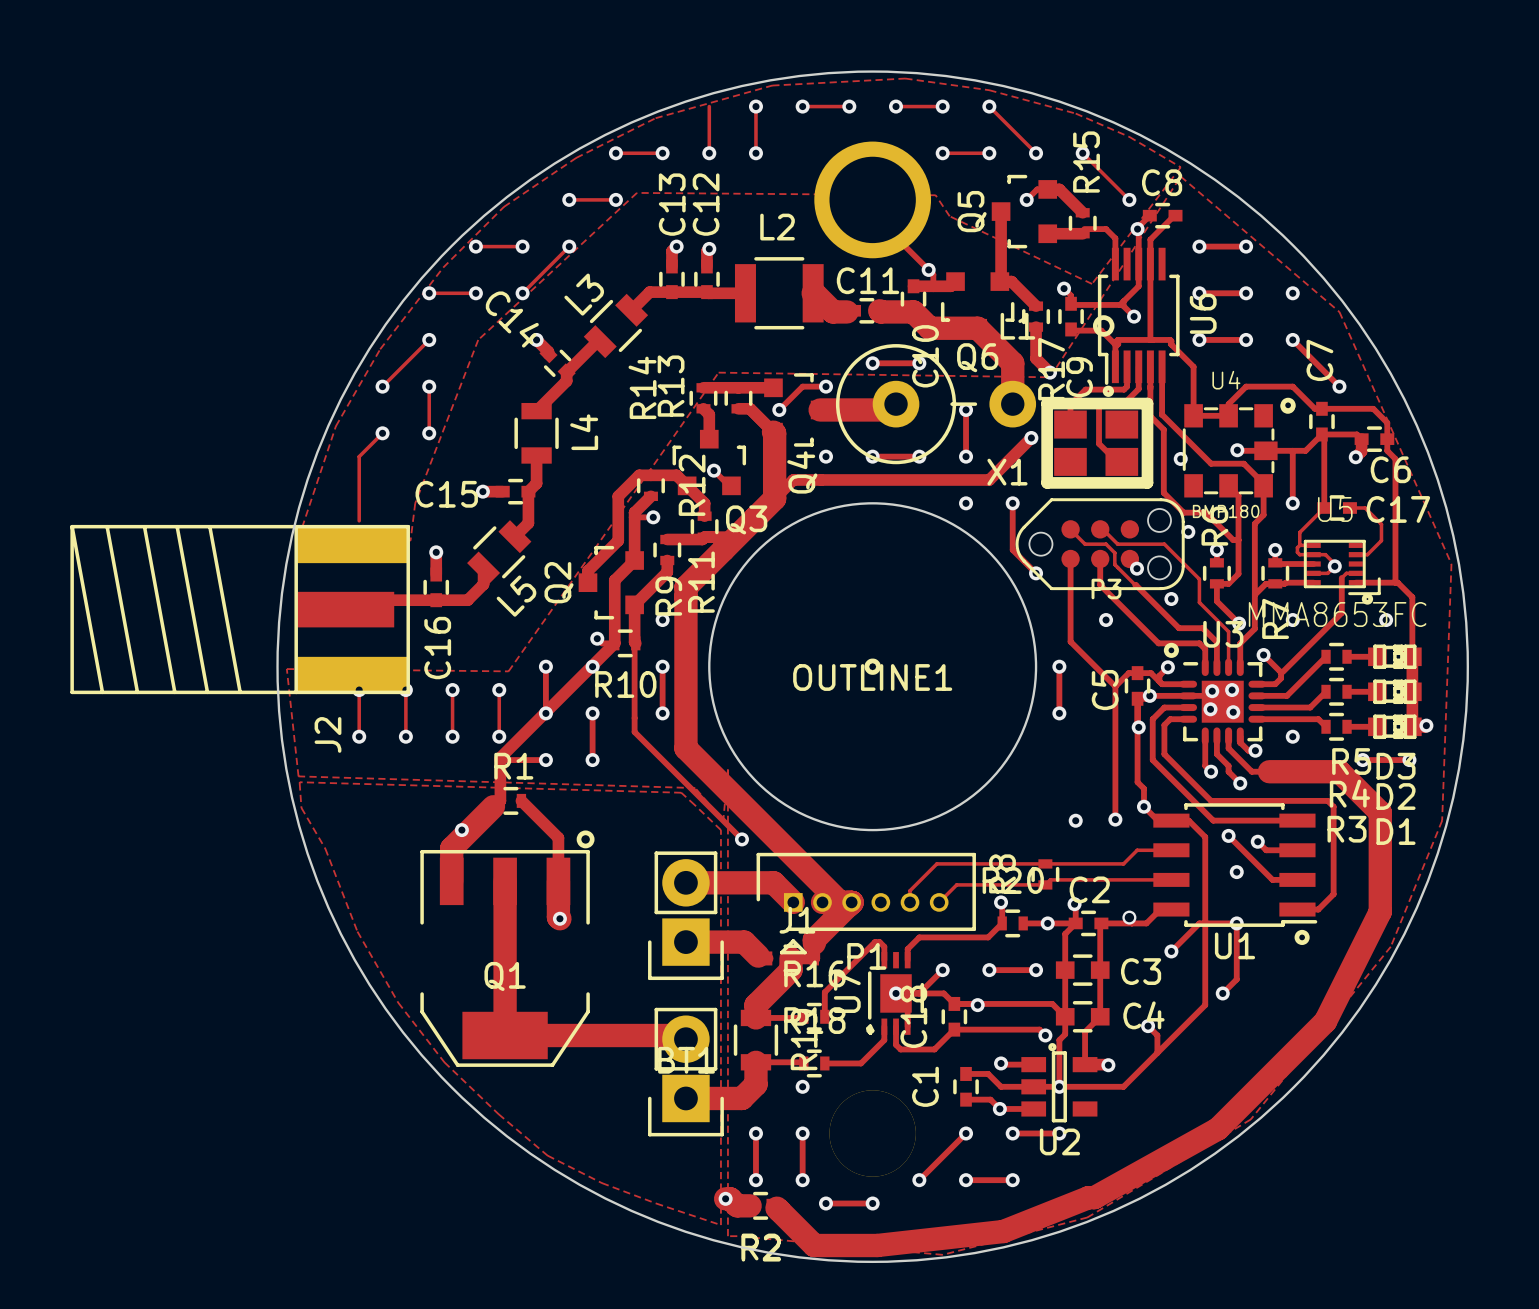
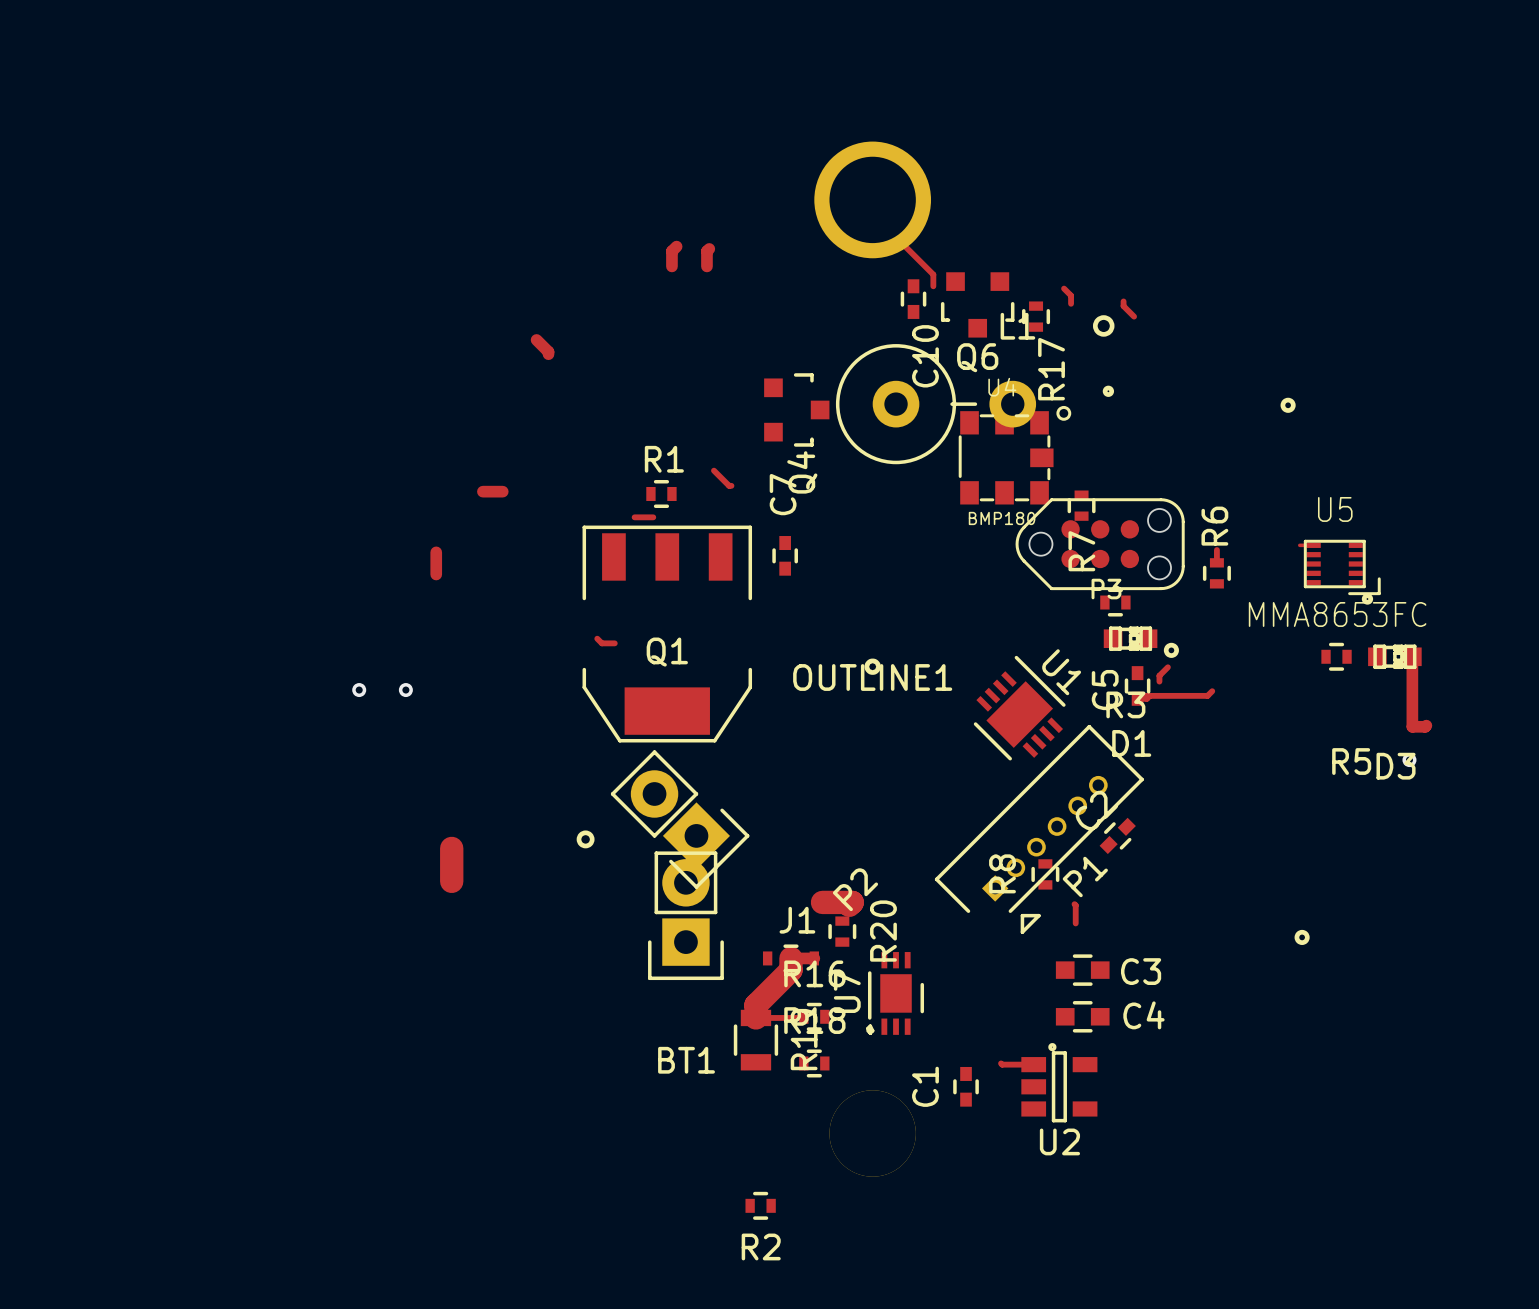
round board edge: [276, 70, 1469, 1264] -> none
zone outline: (905, 78) (772, 85) (655, 118) (576, 157) (503, 206) (443, 267) (380, 349) (335, 426) (298, 538) (410, 540) (415, 503) (478, 339) (636, 192) (935, 195) (949, 216) (1092, 283) (1180, 167) (1129, 136) (1075, 113) (989, 90) (905, 78) -> none
track: (709, 106) (709, 153) -> none
track: (755, 106) (755, 153) -> none
via: (755, 106) -> none
track: (802, 106) (849, 106) -> none
via: (802, 106) -> none
via: (849, 106) -> none
track: (896, 106) (942, 106) -> none
via: (896, 106) -> none
via: (942, 106) -> none
track: (989, 106) (1036, 153) -> none
via: (989, 106) -> none
track: (615, 153) (662, 153) -> none
via: (615, 153) -> none
via: (662, 153) -> none
via: (709, 153) -> none
via: (755, 153) -> none
track: (942, 153) (989, 153) -> none
via: (942, 153) -> none
via: (989, 153) -> none
via: (1036, 153) -> none
track: (1082, 153) (1129, 199) -> none
via: (1082, 153) -> none
zone outline: (1180, 176) (1050, 377) (718, 372) (508, 671) (286, 669) (298, 776) (695, 788) (723, 820) (727, 769) (727, 1236) (942, 1254) (1087, 1217) (1250, 1119) (1390, 946) (1442, 820) (1451, 564) (1339, 311) (1180, 176) -> none
track: (569, 199) (615, 199) -> none
via: (569, 199) -> none
via: (615, 199) -> none
track: (1026, 199) (1037, 189) (1059, 189) (1082, 212) -> none
via: (1026, 199) -> none
via: (1129, 199) -> none
track: (1001, 211) (999, 281) (1011, 281) (1036, 306) -> none
Q5: (1024, 211) -> none
track: (1149, 215) (1138, 226) (1138, 286) (1120, 304) (1072, 304) -> none
C8: (1162, 215) -> none
track: (1175, 215) (1150, 239) (1150, 339) -> none
R15: (1082, 223) -> none
track: (1084, 229) (1106, 229) (1115, 238) (1115, 264) -> none
via: (1137, 229) -> none
track: (1047, 233) (1082, 233) -> none
track: (475, 246) (522, 246) -> none
via: (475, 246) -> none
via: (522, 246) -> none
track: (569, 246) (522, 293) -> none
via: (569, 246) -> none
via: (676, 246) -> none
track: (1199, 246) (1246, 246) -> none
via: (1199, 246) -> none
via: (1246, 246) -> none
via: (709, 248) -> none
via: (928, 269) -> none
C13: (671, 279) -> none
C12: (706, 279) -> none
track: (955, 281) (950, 286) (913, 286) -> none
via: (1064, 288) -> none
track: (429, 293) (475, 293) -> none
via: (429, 293) -> none
via: (475, 293) -> none
via: (522, 293) -> none
track: (745, 293) (649, 292) (631, 310) -> none
L2: (779, 293) -> none
track: (813, 293) (832, 311) (847, 311) -> none
track: (1199, 293) (1246, 293) -> none
via: (1199, 293) -> none
via: (1246, 293) -> none
via: (1292, 293) -> none
C11: (866, 310) -> none
track: (879, 310) (913, 311) (929, 328) (977, 328) (1012, 363) (1012, 404) -> none
C9: (1071, 316) -> none
via: (1134, 316) -> none
U6: (1138, 316) -> none
L3: (615, 325) -> none
track: (1036, 327) (1036, 358) (1050, 372) -> none
track: (1072, 330) (1101, 330) (1115, 344) (1118, 343) -> none
track: (429, 339) (382, 386) -> none
via: (429, 339) -> none
via: (536, 339) -> none
track: (1199, 339) (1246, 339) -> none
via: (1199, 339) -> none
via: (1246, 339) -> none
track: (1292, 339) (1339, 386) -> none
via: (1292, 339) -> none
track: (600, 341) (597, 341) (566, 372) (566, 381) (536, 411) -> none
track: (1170, 343) (1193, 366) (1193, 415) (1228, 415) (1228, 404) (1246, 386) (1292, 386) (1314, 408) (1373, 408) (1387, 422) (1387, 450) (1395, 458) (1395, 582) -> none
track: (1171, 344) (1170, 339) (1117, 339) (1115, 342) (1115, 366) -> none
C14: (557, 363) -> none
track: (872, 363) (919, 363) -> none
via: (872, 363) -> none
via: (919, 363) -> none
track: (1127, 366) (1127, 386) (1124, 389) (1085, 389) (1070, 404) (1070, 424) -> none
track: (1138, 366) (1138, 388) (1126, 401) (1103, 401) (1099, 405) (1099, 443) (1117, 461) (1121, 461) -> none
track: (1150, 366) (1150, 416) (1163, 429) (1163, 492) (1183, 512) (1205, 512) (1233, 540) (1238, 540) -> none
track: (1162, 366) (1162, 414) (1211, 463) (1243, 463) (1263, 483) (1263, 515) (1254, 523) (1254, 628) (1240, 643) (1240, 667) -> none
via: (1050, 372) -> none
via: (382, 386) -> none
track: (429, 386) (429, 433) -> none
via: (429, 386) -> none
track: (825, 386) (802, 386) (779, 409) -> none
via: (825, 386) -> none
via: (1339, 386) -> none
track: (703, 387) (773, 387) -> none
R13: (703, 398) -> none
R14: (738, 398) -> none
track: (896, 404) (890, 409) (820, 409) -> none
track: (703, 408) (709, 414) (709, 439) -> none
track: (738, 408) (750, 408) (774, 433) (774, 498) -> none
via: (779, 409) -> none
track: (966, 409) (966, 456) -> none
via: (966, 409) -> none
C7 position: (1321, 421) -> (785, 555)
track: (382, 433) (359, 456) (359, 520) -> none
via: (382, 433) -> none
via: (429, 433) -> none
L4: (536, 433) -> none
track: (1321, 434) (1305, 450) (1237, 450) -> none
track: (1321, 434) (1356, 434) (1361, 439) (1361, 451) (1355, 457) -> none
track: (1321, 434) (1324, 436) (1324, 508) (1299, 532) (1297, 552) (1299, 554) (1325, 554) (1334, 566) (1327, 573) (1313, 573) -> none
track: (1031, 437) (989, 479) (793, 479) (774, 498) -> none
via: (1031, 437) -> none
C6: (1374, 439) -> none
X1: (1097, 443) -> none
U4 position: (1239, 448) -> (1014, 455)
via: (1237, 450) -> none
track: (1292, 450) (1292, 503) -> none
track: (536, 455) (536, 483) (528, 491) (528, 523) (514, 536) -> none
via: (825, 456) -> none
track: (872, 456) (919, 456) -> none
via: (872, 456) -> none
via: (919, 456) -> none
via: (966, 456) -> none
via: (1355, 457) -> none
via: (1180, 458) -> none
Q3: (709, 462) -> none
via: (713, 470) -> none
R12: (650, 485) -> none
track: (1228, 485) (1238, 495) (1238, 573) (1228, 583) (1216, 583) (1216, 601) (1239, 623) -> none
via: (482, 491) -> none
C15: (515, 491) -> none
track: (650, 496) (634, 512) (634, 560) (614, 580) (614, 643) (500, 757) (499, 800) -> none
track: (774, 498) (685, 587) (685, 748) (839, 902) -> none
round board edge: [708, 502, 1038, 832] -> none
via: (966, 503) -> none
track: (1012, 503) (1012, 550) (1036, 573) -> none
via: (1012, 503) -> none
via: (1292, 503) -> none
C17: (1337, 508) -> none
track: (1349, 508) (1365, 508) (1381, 524) (1381, 540) (1367, 554) (1355, 554) -> none
track: (704, 516) (704, 503) (676, 475) (639, 475) (618, 496) (618, 540) (587, 570) (587, 582) -> none
via: (653, 517) -> none
R11: (704, 526) -> none
track: (1070, 529) (1085, 544) (1106, 544) (1114, 552) (1114, 564) (1178, 628) (1202, 628) (1216, 642) (1216, 667) -> none
via: (1188, 531) -> none
track: (1100, 532) (1100, 529) (1102, 529) (1117, 544) (1164, 544) (1199, 579) (1199, 602) (1228, 631) (1228, 667) -> none
track: (667, 539) (736, 537) (732, 540) (723, 540) (723, 550) -> none
R9: (667, 550) -> none
via: (1216, 550) -> none
track: (1275, 550) (1276, 564) (1313, 564) -> none
via: (1275, 550) -> none
via: (436, 552) -> none
L5: (499, 552) -> none
track: (1070, 558) (1070, 641) (1115, 686) -> none
track: (1100, 558) (1100, 585) (1158, 643) (1199, 643) (1205, 649) (1205, 667) -> none
track: (667, 560) (667, 572) (634, 604) (634, 732) (741, 839) -> none
via: (1334, 566) -> none
track: (483, 568) (483, 584) (467, 600) (354, 600) (345, 609) -> none
via: (1136, 568) -> none
via: (1036, 573) -> none
R7 position: (1275, 573) -> (1081, 505)
track: (1355, 573) (1346, 573) (1341, 578) (1341, 613) (1282, 671) (1280, 671) -> none
Q2: (611, 582) -> none
track: (1313, 582) (1265, 583) (1254, 594) -> none
track: (1355, 582) (1397, 582) (1412, 597) (1412, 726) -> none
C16: (436, 587) -> none
via: (1171, 599) -> none
J2: (240, 609) -> none
via: (662, 620) -> none
via: (1106, 620) -> none
via: (1292, 620) -> none
via: (1386, 620) -> none
via: (1239, 623) -> none
via: (597, 638) -> none
R10: (625, 643) -> none
track: (1263, 655) (1281, 672) (1281, 678) (1275, 684) (1257, 684) -> none
via: (1263, 655) -> none
track: (1326, 656) (1286, 695) (1257, 695) -> none
track: (1347, 656) (1377, 656) -> none
track: (545, 666) (545, 713) -> none
via: (545, 666) -> none
via: (592, 666) -> none
track: (662, 666) (662, 713) -> none
via: (662, 666) -> none
track: (1059, 666) (1059, 713) -> none
via: (1059, 666) -> none
via: (1167, 667) -> none
track: (1188, 684) (1162, 684) (1150, 673) (1128, 673) (1115, 686) -> none
track: (1115, 686) (1115, 819) -> none
track: (359, 690) (359, 736) -> none
track: (405, 690) (405, 736) -> none
track: (452, 690) (452, 736) -> none
via: (452, 690) -> none
track: (499, 690) (499, 736) -> none
via: (499, 690) -> none
via: (1232, 690) -> none
via: (1212, 691) -> none
track: (1326, 691) (1310, 707) (1257, 707) -> none
R4: (1336, 691) -> none
track: (1347, 691) (1377, 691) -> none
D2: (1394, 691) -> none
via: (1149, 695) -> none
track: (1137, 698) (1137, 782) (1143, 788) (1143, 806) (1157, 820) (1188, 820) (1205, 837) (1205, 1005) (1123, 1086) (1001, 1086) (988, 1073) (966, 1073) -> none
U3: (1222, 701) -> none
track: (1188, 707) (1164, 707) (1152, 719) (1152, 760) (1213, 820) (1297, 820) -> none
via: (1210, 709) -> none
via: (1233, 712) -> none
via: (545, 713) -> none
track: (592, 713) (592, 760) -> none
via: (592, 713) -> none
via: (662, 713) -> none
via: (1059, 713) -> none
track: (1188, 719) (1170, 719) (1164, 725) (1164, 754) (1211, 800) (1327, 800) (1333, 806) (1333, 894) (1318, 909) (1297, 909) -> none
track: (1257, 719) (1318, 719) (1326, 726) -> none
via: (1426, 725) -> none
R3 position: (1336, 726) -> (1115, 602)
track: (1347, 726) (1377, 726) -> none
D1 position: (1394, 726) -> (1130, 638)
via: (1138, 727) -> none
via: (359, 736) -> none
via: (405, 736) -> none
via: (452, 736) -> none
via: (499, 736) -> none
track: (1205, 736) (1205, 765) (1211, 771) -> none
track: (1216, 736) (1216, 754) (1228, 765) (1228, 771) (1240, 783) -> none
track: (1228, 736) (1228, 748) (1251, 771) (1339, 771) (1380, 812) (1380, 911) (1325, 1021) (1218, 1128) (1094, 1197) (1088, 1197) (1003, 1231) (877, 1245) (814, 1245) (776, 1208) -> none
via: (1292, 736) -> none
track: (1240, 742) (1248, 750) (1255, 750) -> none
via: (1255, 750) -> none
track: (500, 760) (545, 760) -> none
via: (545, 760) -> none
via: (592, 760) -> none
track: (1362, 760) (1409, 760) -> none
via: (1362, 760) -> none
via: (1211, 771) -> none
zone outline: (299, 782) (681, 792) (720, 830) (720, 1225) (601, 1183) (547, 1155) (498, 1114) (444, 1062) (398, 1002) (357, 931) (325, 848) (301, 807) (299, 782) -> none
via: (1240, 783) -> none
R1 position: (510, 800) -> (661, 493)
track: (521, 800) (558, 837) (559, 918) -> none
U1 footprint: [1153, 803, 1318, 927] -> [973, 655, 1066, 761]
track: (493, 806) (451, 848) (451, 840) (461, 830) -> none
via: (1143, 806) -> none
via: (1115, 819) -> none
via: (1075, 820) -> none
via: (461, 830) -> none
track: (1228, 835) (1272, 879) (1297, 879) (1300, 876) -> none
via: (1228, 835) -> none
via: (741, 839) -> none
track: (1257, 841) (1266, 850) (1297, 850) -> none
via: (1257, 841) -> none
track: (1171, 850) (1137, 850) (1123, 863) (936, 863) (910, 890) (910, 902) -> none
via: (1236, 872) -> none
track: (505, 881) (505, 1035) (688, 1035) (685, 1039) -> none
track: (1169, 881) (1171, 879) (1050, 879) (1045, 884) (956, 884) (939, 902) -> none
track: (685, 882) (773, 882) (793, 902) -> none
track: (851, 902) (814, 939) (814, 958) -> none
track: (1001, 902) (1002, 923) (988, 937) (919, 937) (907, 949) (907, 960) -> none
via: (1001, 902) -> none
P1 rotation: 0° (866, 903) -> 45° counterclockwise (1039, 829)
P1 position: (866, 903) -> (1039, 829)
via: (1074, 904) -> none
track: (1171, 909) (1160, 909) (1146, 923) (1100, 924) (1100, 1016) (1085, 1031) (1085, 1064) (1108, 1065) -> none
via: (1129, 917) -> none
via: (559, 918) -> none
R20 rotation: 0° (1012, 923) -> 90° clockwise (842, 931)
R20 position: (1012, 923) -> (842, 931)
track: (1023, 923) (1075, 923) (1065, 933) (1065, 1034) (1059, 1040) (1059, 1086) -> none
via: (1047, 923) -> none
C2 rotation: 0° (1088, 923) -> 45° counterclockwise (1117, 835)
C2 position: (1088, 923) -> (1117, 835)
via: (1236, 923) -> none
track: (685, 942) (744, 942) (760, 958) (767, 958) -> none
U1 name position: U1 (1234, 945) -> U1 (1061, 672)
track: (1171, 951) (1199, 923) (1236, 923) (1236, 979) (1222, 993) -> none
via: (1171, 951) -> none
Q1 position: (505, 958) -> (667, 634)
track: (884, 960) (884, 946) (879, 942) (875, 942) (824, 992) (824, 1016) -> none
track: (942, 970) (919, 993) -> none
via: (942, 970) -> none
track: (989, 970) (1036, 970) -> none
via: (989, 970) -> none
via: (1036, 970) -> none
via: (896, 993) -> none
via: (1222, 993) -> none
via: (977, 1005) -> none
C18: (954, 1016) -> none
track: (1065, 1016) (1052, 1003) (954, 1003) (943, 993) (896, 993) (907, 1005) (907, 1026) -> none
track: (884, 1026) (884, 1040) (861, 1063) (824, 1063) -> none
track: (896, 1026) (896, 1044) (900, 1049) (934, 1049) (954, 1029) (1039, 1029) (1045, 1035) -> none
track: (1148, 1026) (1157, 1035) (1157, 1052) -> none
via: (1148, 1026) -> none
via: (1045, 1035) -> none
track: (803, 1063) (755, 1062) (755, 1084) (741, 1098) (685, 1098) -> none
via: (1001, 1063) -> none
via: (1108, 1065) -> none
P2 rotation: 0° (685, 1072) -> 45° counterclockwise (680, 819)
P2 position: (685, 1072) -> (680, 819)
via: (802, 1086) -> none
via: (1059, 1086) -> none
track: (966, 1099) (990, 1099) (999, 1108) (1033, 1108) -> none
via: (999, 1108) -> none
track: (755, 1133) (755, 1180) -> none
via: (755, 1133) -> none
track: (802, 1133) (802, 1180) -> none
via: (802, 1133) -> none
track: (966, 1133) (919, 1180) -> none
via: (966, 1133) -> none
track: (1012, 1133) (1059, 1133) -> none
via: (1012, 1133) -> none
via: (1059, 1133) -> none
via: (755, 1180) -> none
via: (802, 1180) -> none
via: (919, 1180) -> none
track: (966, 1180) (1012, 1180) -> none
via: (966, 1180) -> none
via: (1012, 1180) -> none
track: (725, 1198) (730, 1198) (737, 1205) (750, 1205) -> none
via: (725, 1198) -> none
track: (825, 1203) (872, 1203) -> none
via: (825, 1203) -> none
via: (872, 1203) -> none

